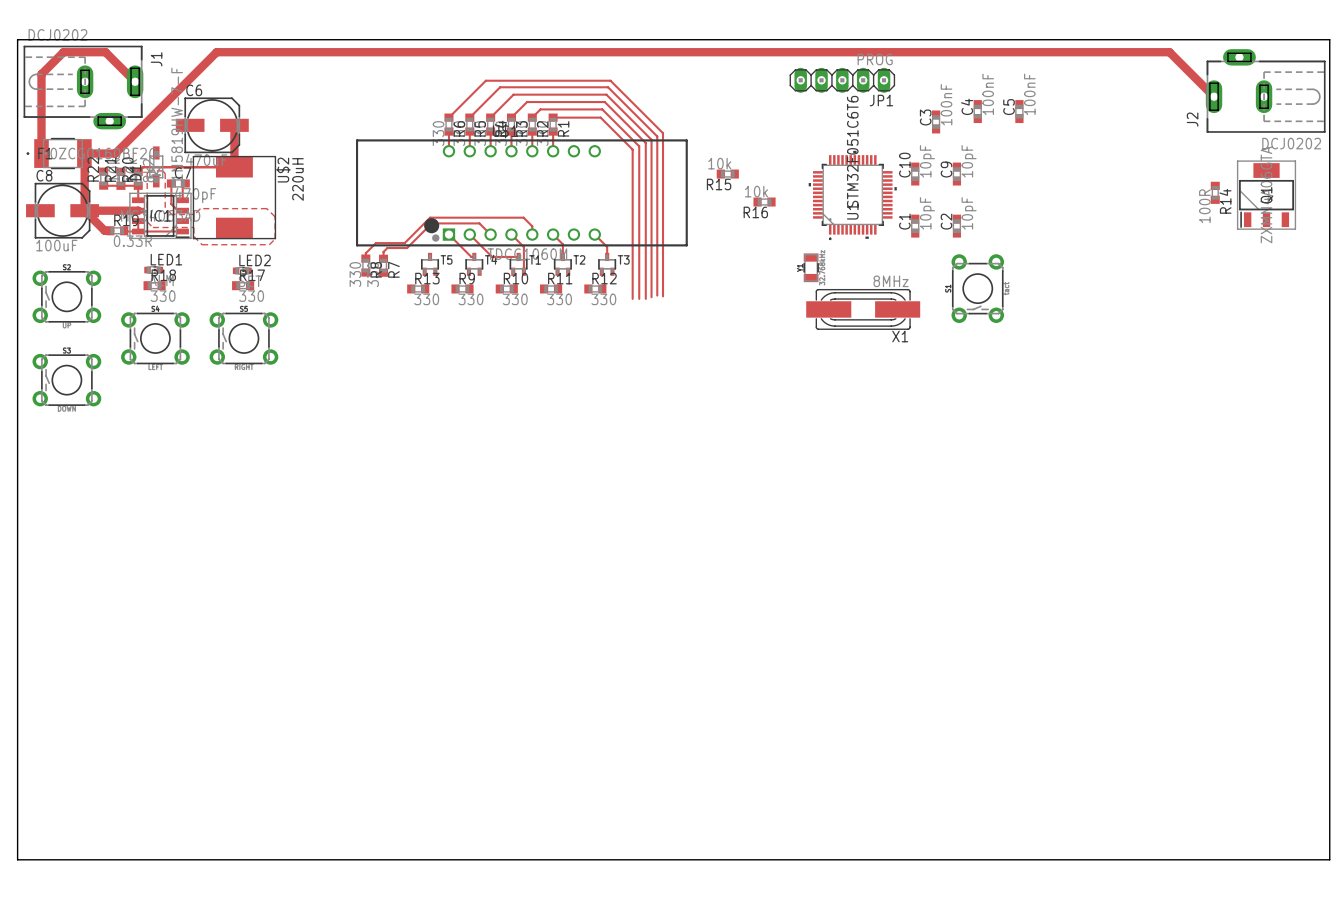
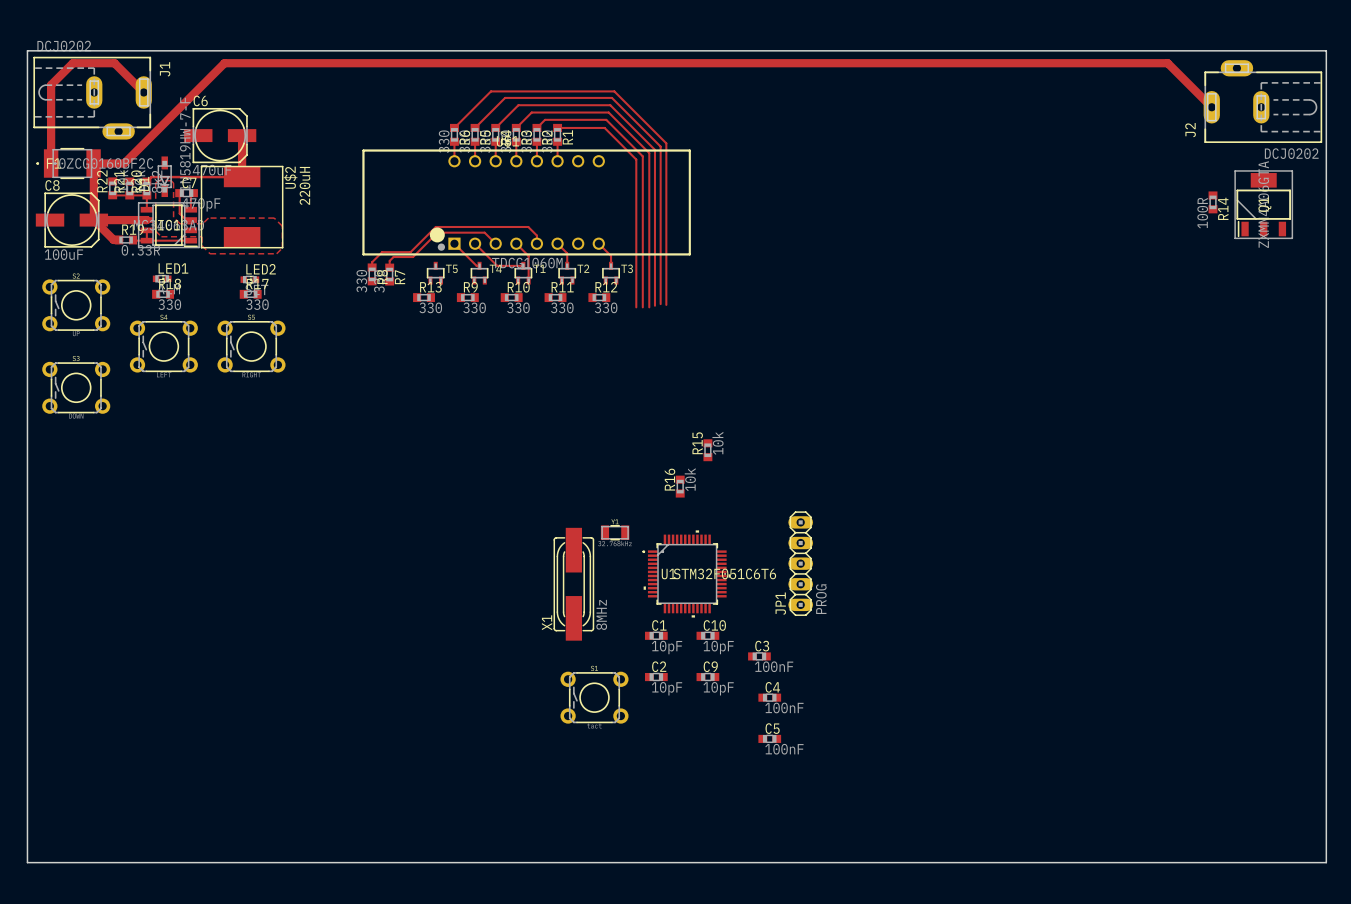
JP1 rotation: 0° (842, 80) -> 90° clockwise (800, 563)
JP1 position: (842, 80) -> (800, 563)
C4 rotation: 0° (977, 111) -> 90° clockwise (769, 697)
C4 position: (977, 111) -> (769, 697)
C5 rotation: 0° (1019, 111) -> 90° clockwise (769, 738)
C5 position: (1019, 111) -> (769, 738)
C3 rotation: 0° (936, 121) -> 90° clockwise (759, 656)
C3 position: (936, 121) -> (759, 656)
R15 rotation: 0° (727, 174) -> 90° clockwise (707, 450)
R15 position: (727, 174) -> (707, 450)
C10 rotation: 0° (915, 174) -> 90° clockwise (707, 635)
C10 position: (915, 174) -> (707, 635)
C9 rotation: 0° (956, 174) -> 90° clockwise (707, 677)
C9 position: (956, 174) -> (707, 677)
U1 rotation: 0° (852, 195) -> 90° clockwise (686, 573)
U1 position: (852, 195) -> (686, 573)
R16 rotation: 0° (764, 202) -> 90° clockwise (680, 486)
R16 position: (764, 202) -> (680, 486)
C1 rotation: 0° (915, 226) -> 90° clockwise (656, 635)
C1 position: (915, 226) -> (656, 635)
C2 rotation: 0° (956, 226) -> 90° clockwise (656, 677)
C2 position: (956, 226) -> (656, 677)
part rotation: 0° (811, 267) -> 90° clockwise (615, 532)
part position: (811, 267) -> (615, 532)
part rotation: 0° (977, 288) -> 90° clockwise (594, 697)
part position: (977, 288) -> (594, 697)
X1 rotation: 0° (863, 309) -> 90° clockwise (573, 584)
X1 position: (863, 309) -> (573, 584)

